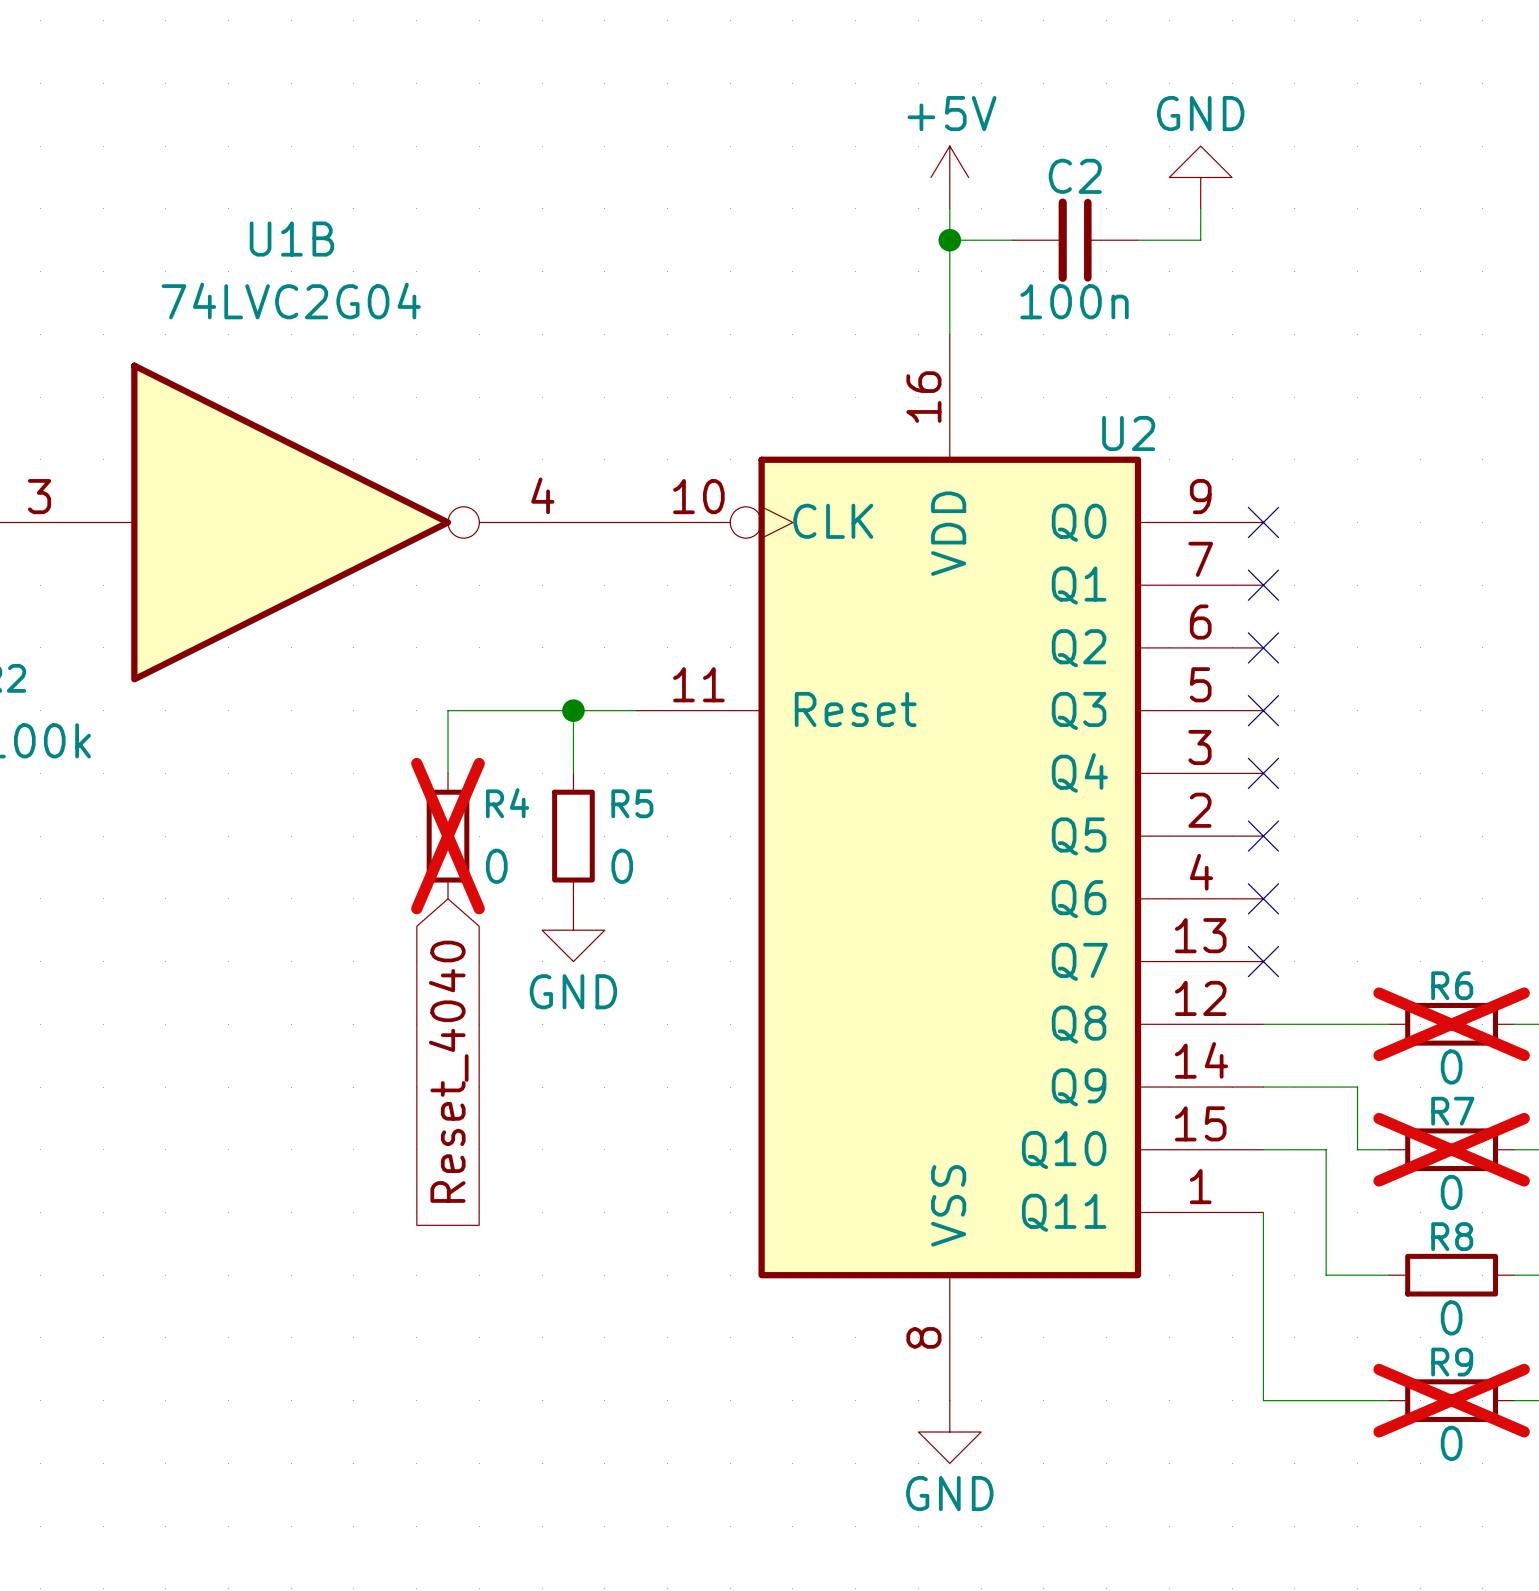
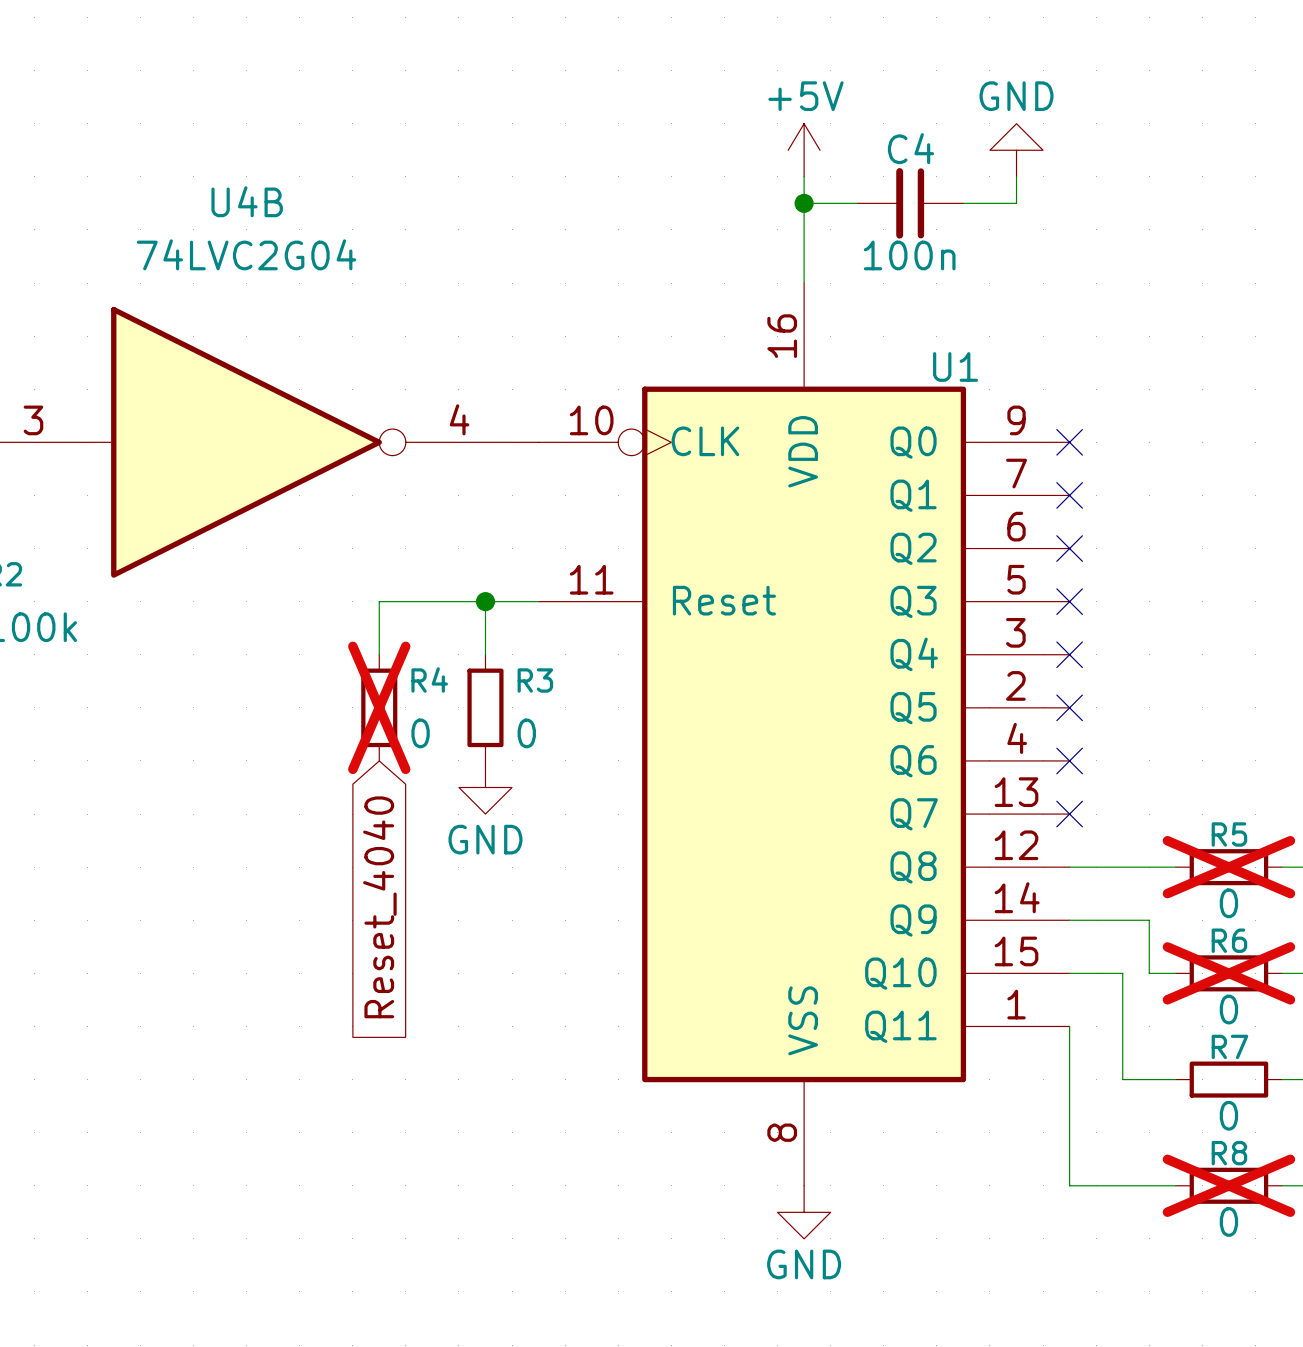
C2 name: C2 (1075, 176) -> C4 (910, 148)
U1B name: U1B (291, 239) -> U4B (247, 201)
U2 name: U2 (1128, 433) -> U1 (955, 366)
R5 name: R5 (632, 803) -> R3 (535, 680)
R6 name: R6 (1452, 985) -> R5 (1229, 834)
R7 name: R7 (1452, 1111) -> R6 (1229, 940)
R8 name: R8 (1452, 1236) -> R7 (1229, 1046)
R9 name: R9 (1452, 1362) -> R8 (1229, 1153)

